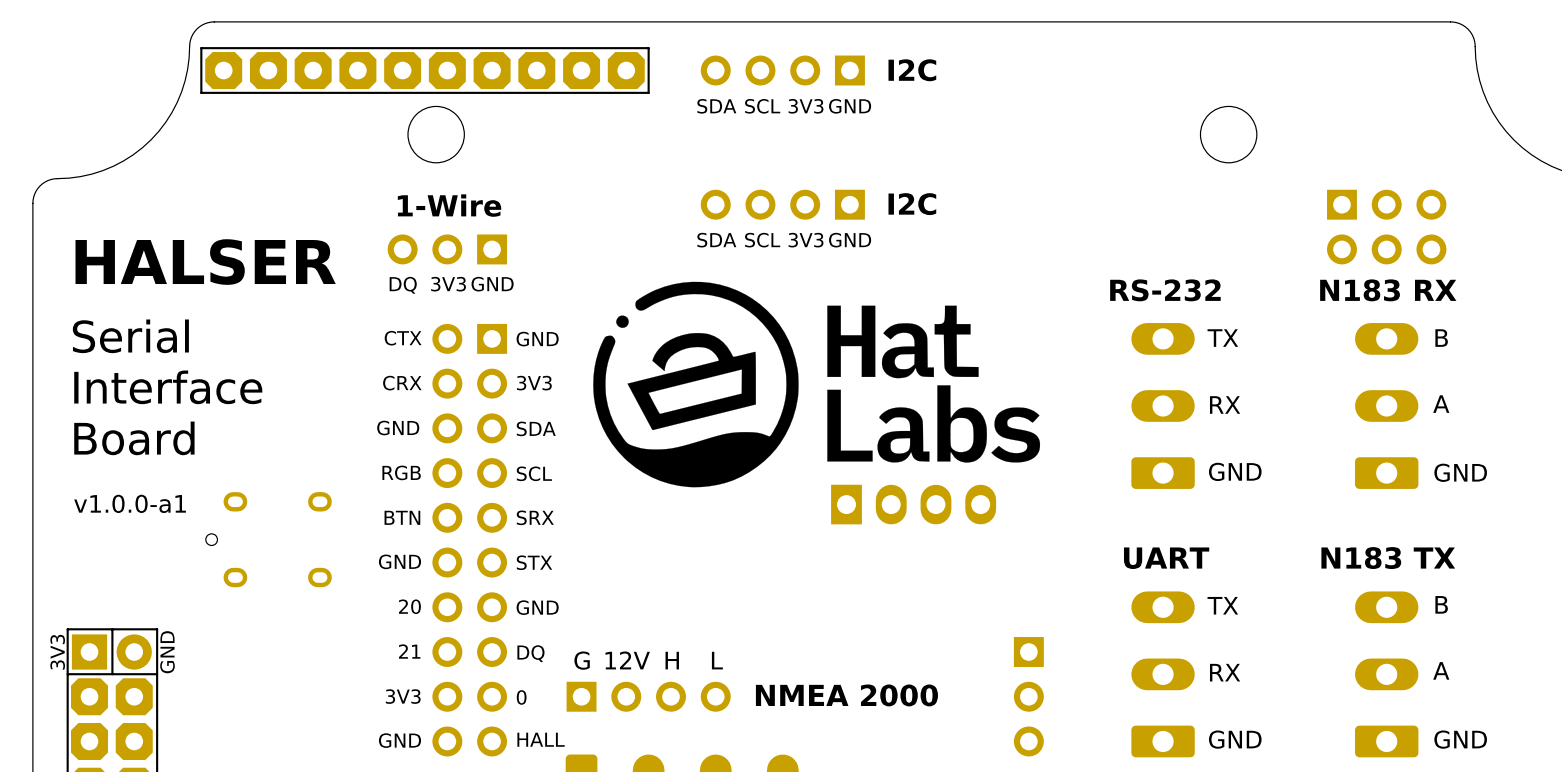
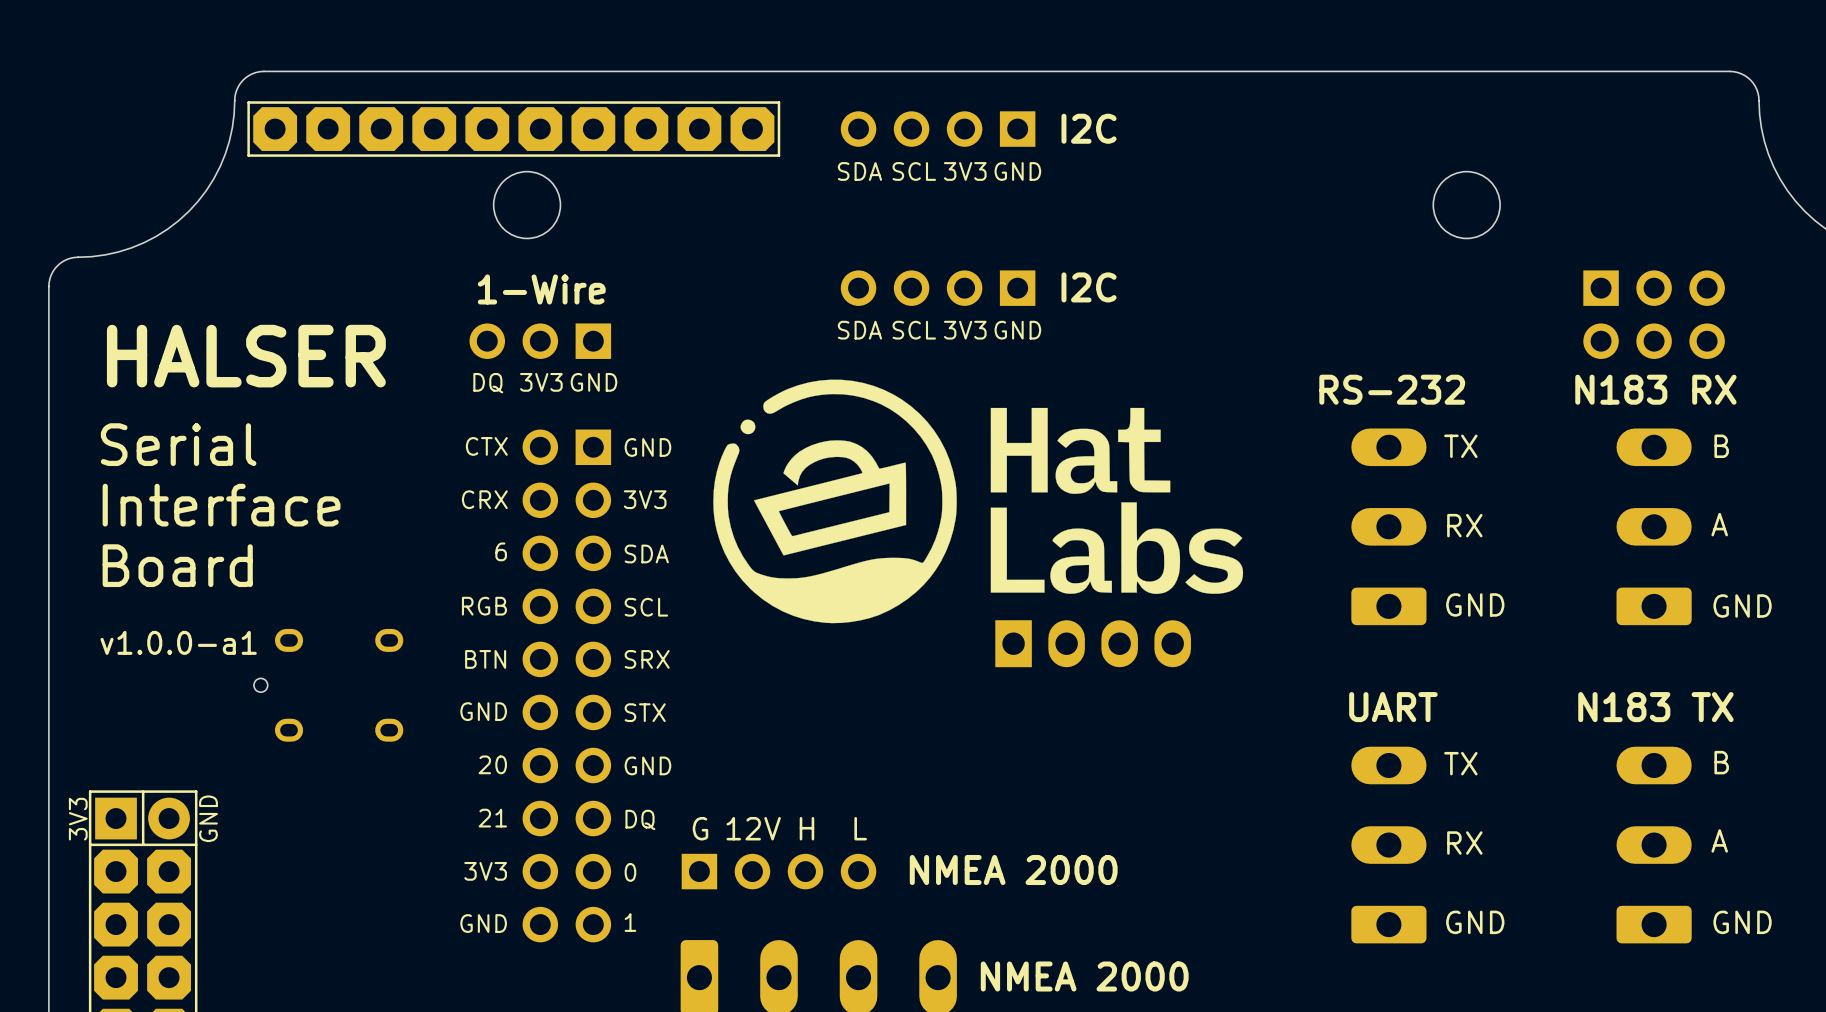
text: GND (398, 428) -> 6 (501, 551)
part: (1028, 696) -> none
text: HALL (541, 739) -> 1 (630, 922)

